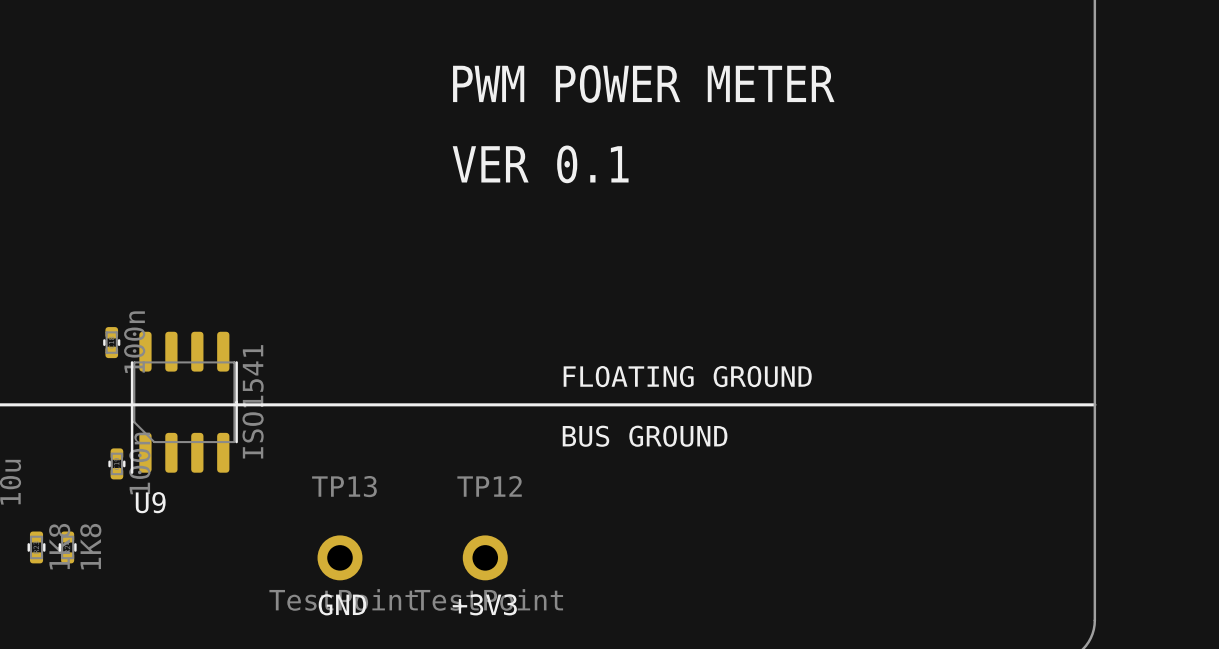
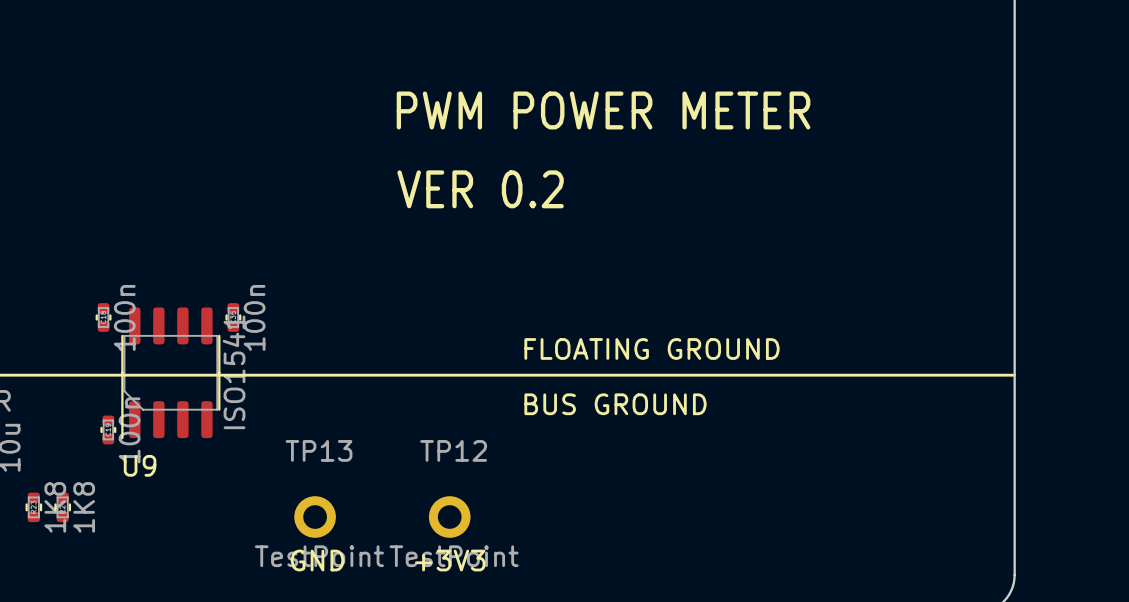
text position: PWM POWER METER (643, 83) -> PWM POWER METER (603, 110)
text: VER 0.1 (540, 164) -> VER 0.2 (480, 189)
part: none -> 100n (233, 317)

